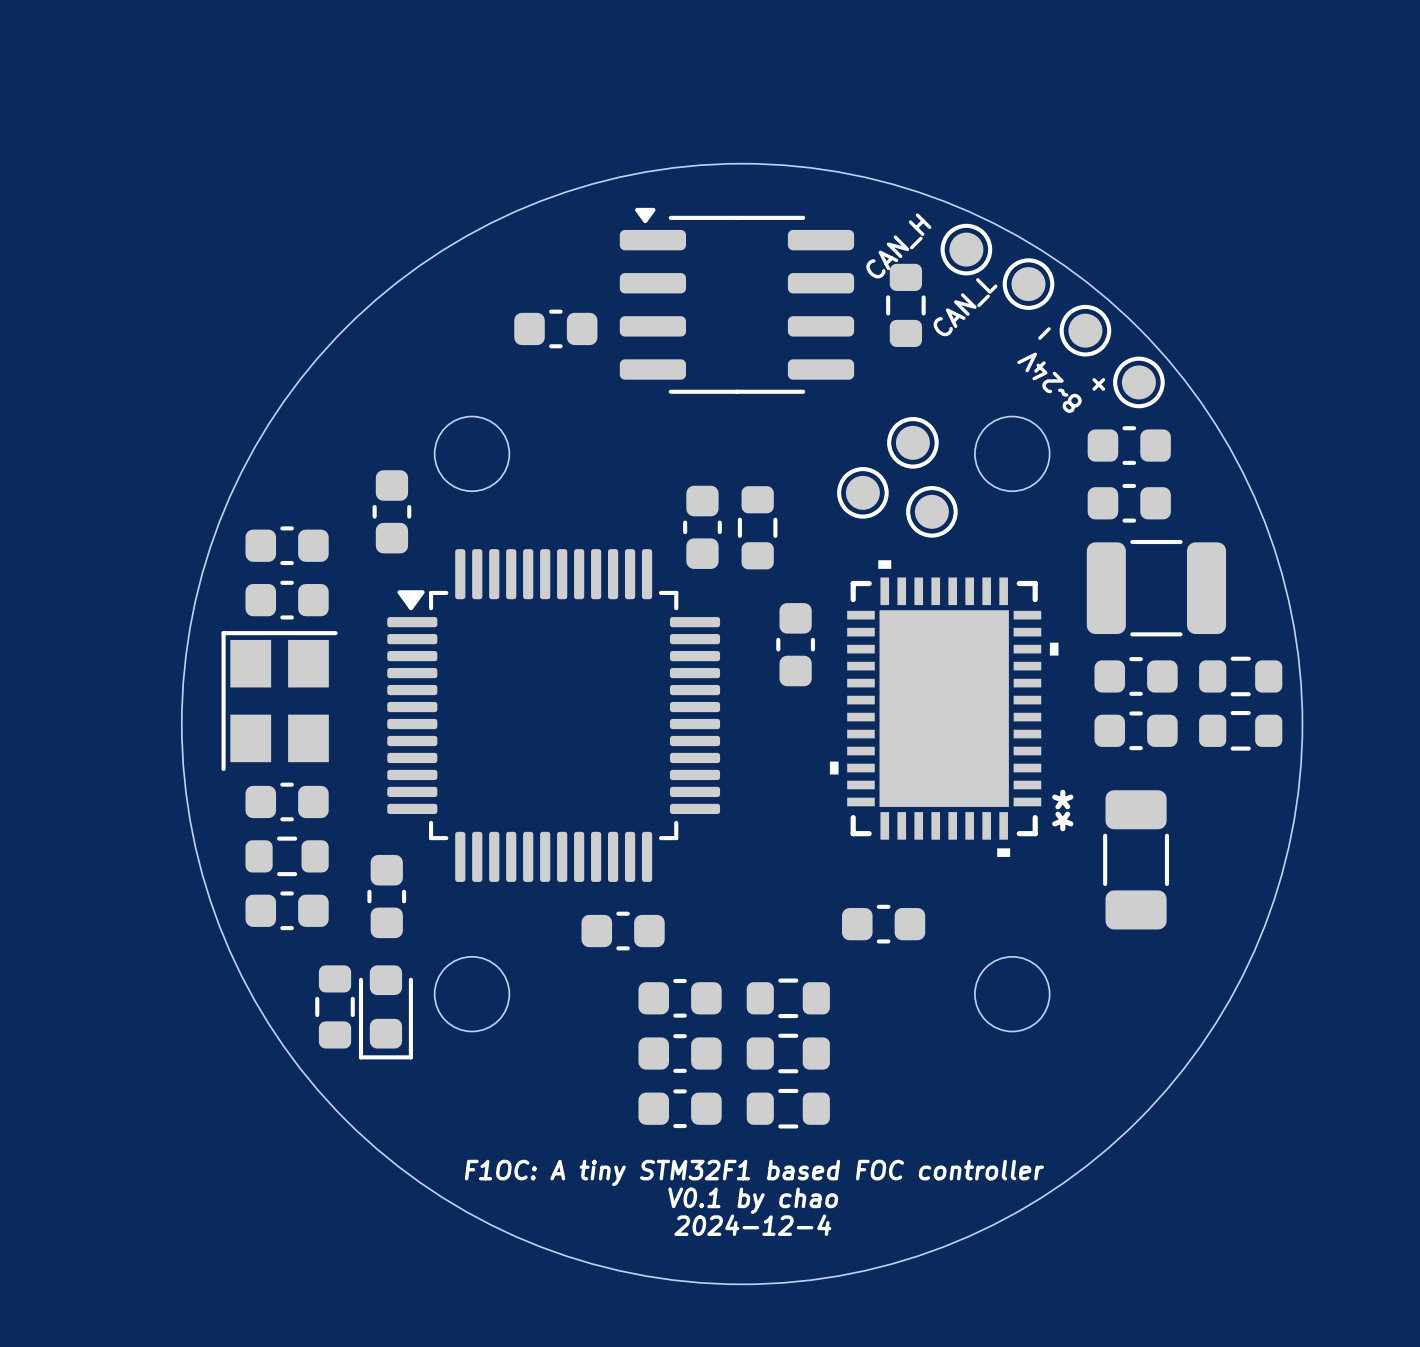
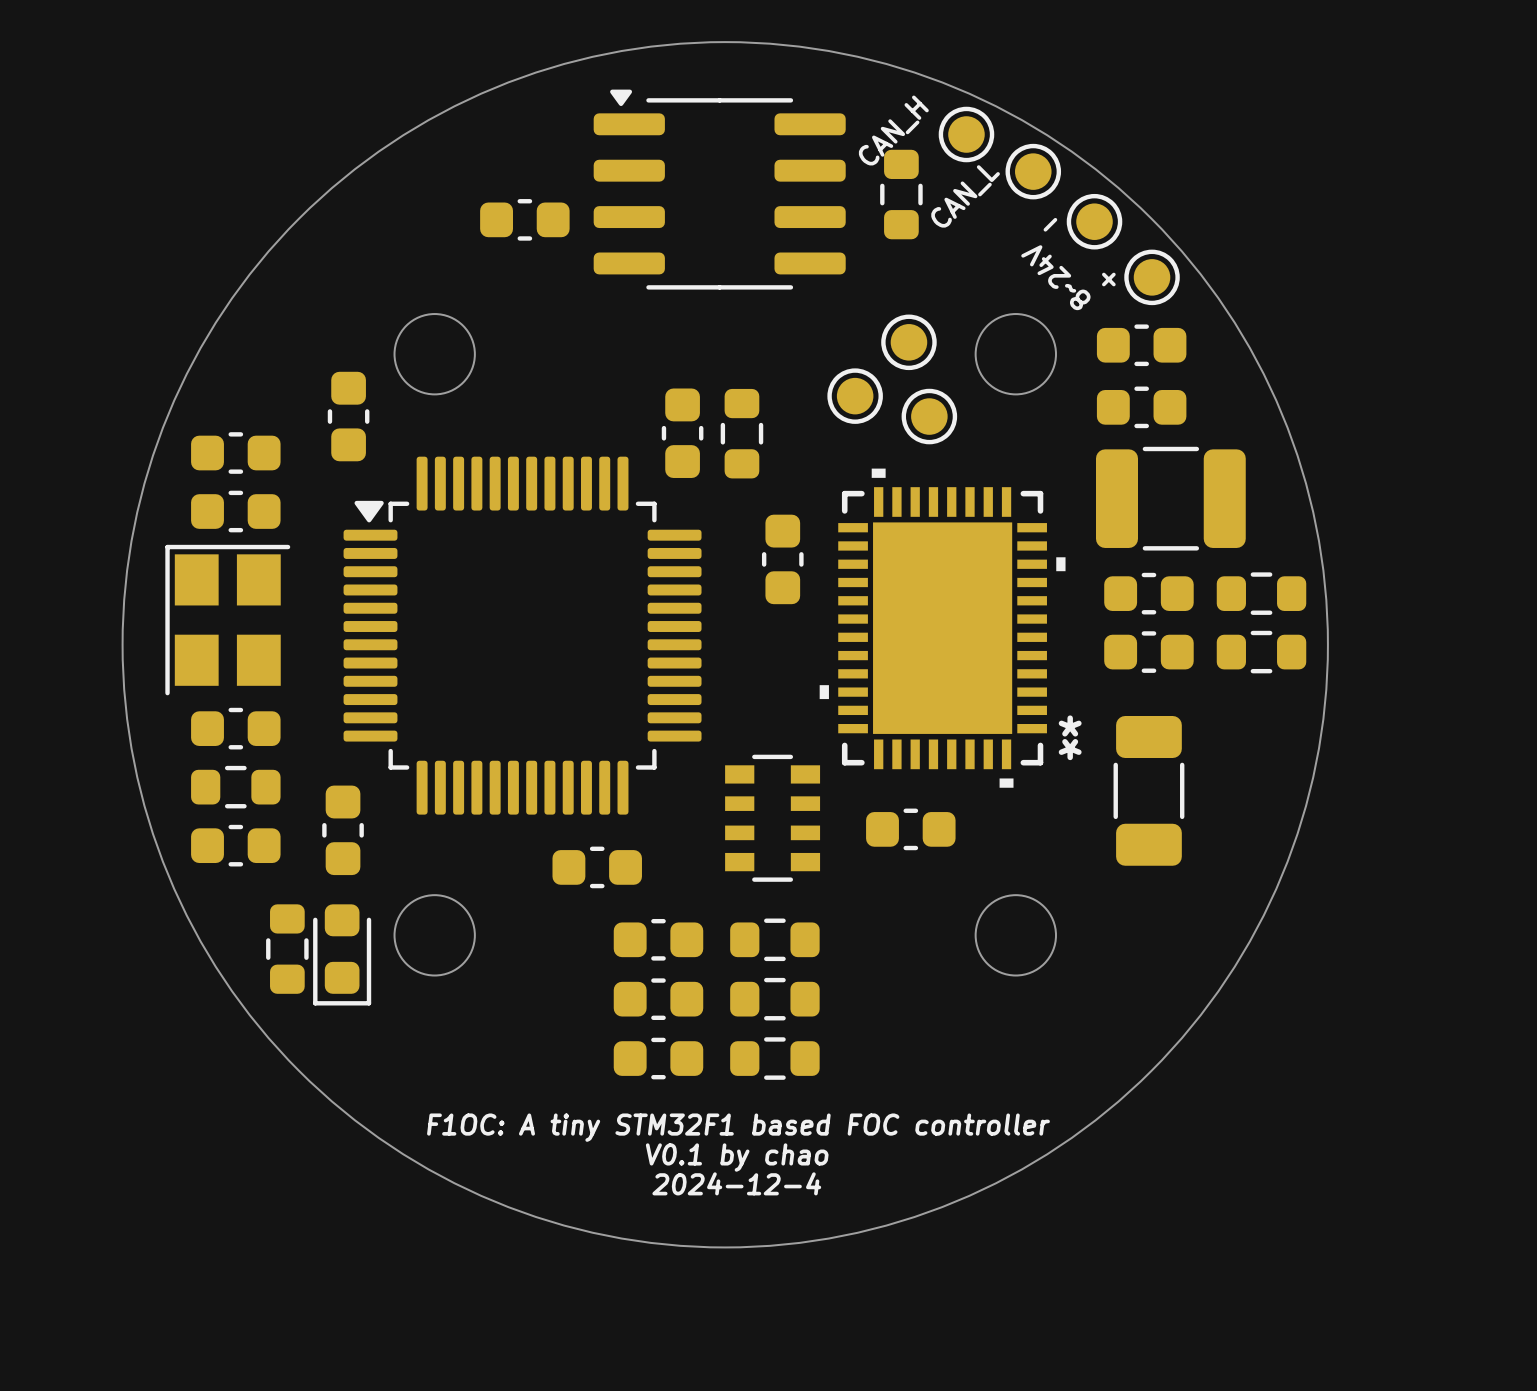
part: none -> (772, 818)
part position: (883, 924) -> (910, 829)

